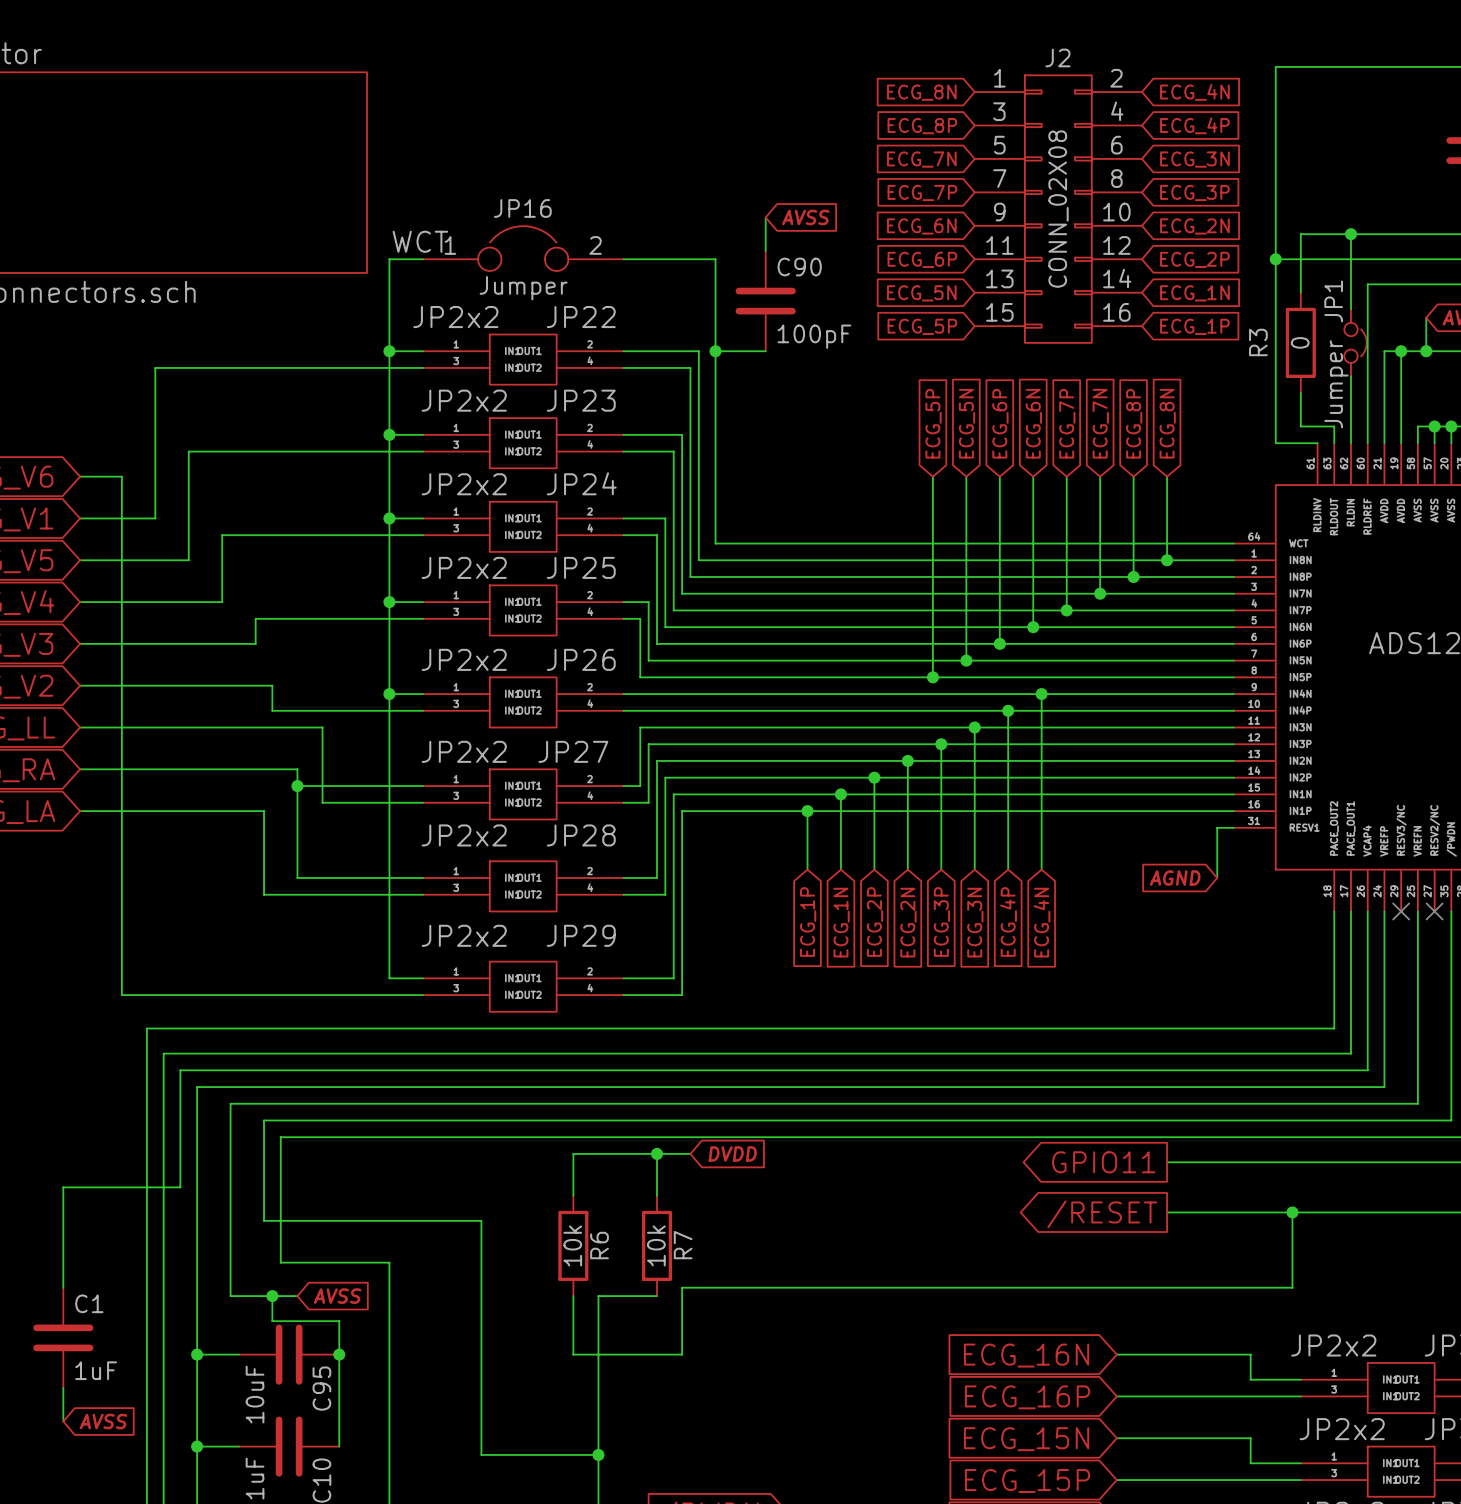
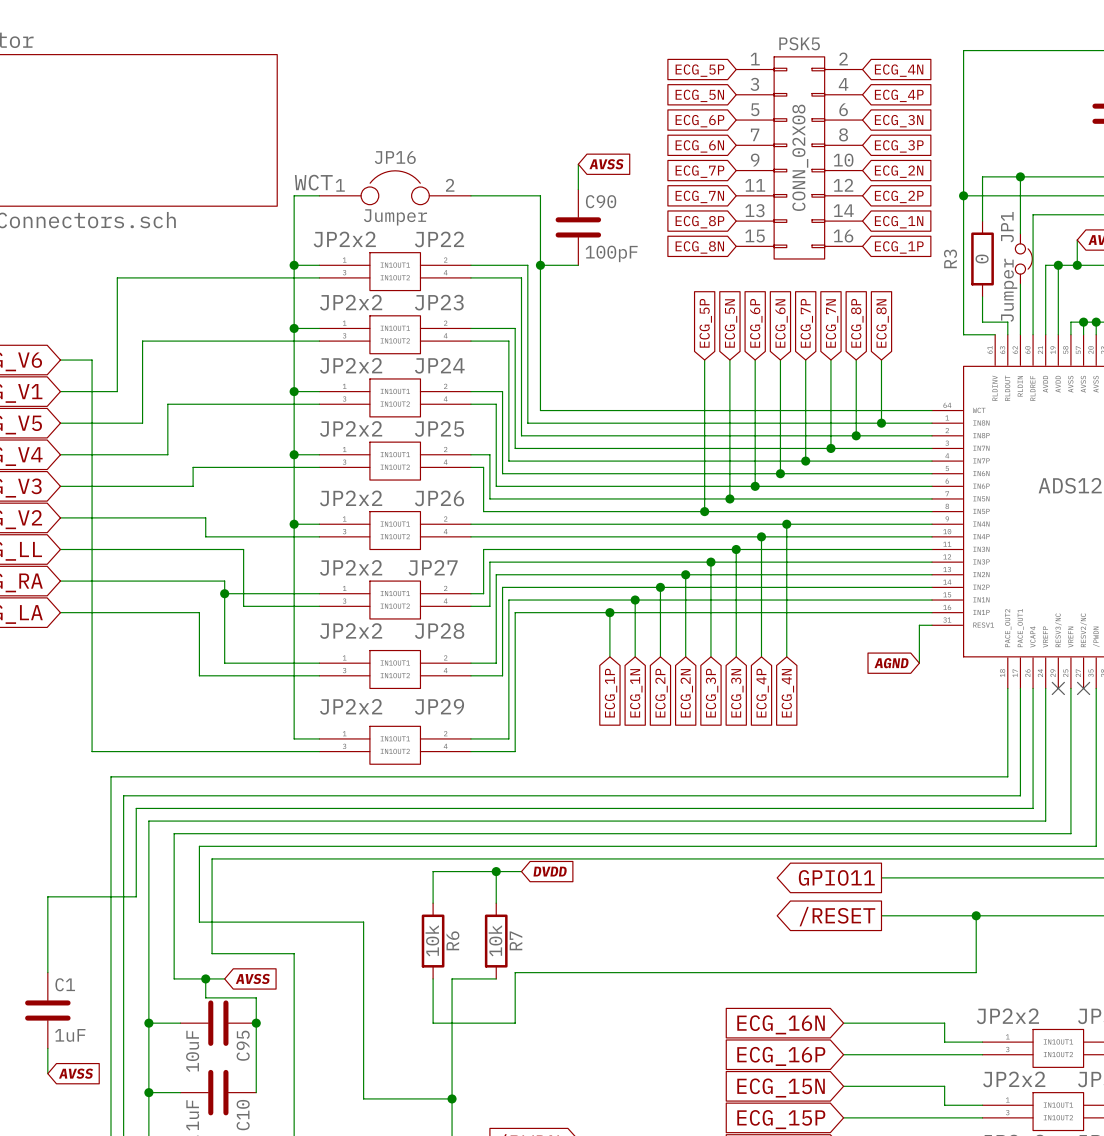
J2 name: J2 (1057, 57) -> PSK5 (799, 43)
global label: ECG_8N (921, 92) -> ECG_5P (699, 70)
global label: ECG_8P (922, 126) -> ECG_5N (699, 95)
global label: ECG_7N (921, 159) -> ECG_6P (699, 121)
global label: ECG_7P (922, 193) -> ECG_6N (699, 146)
global label: ECG_6N (921, 226) -> ECG_7P (699, 171)
global label: ECG_6P (922, 259) -> ECG_7N (699, 196)
global label: ECG_5N (921, 293) -> ECG_8P (699, 222)
global label: ECG_5P (922, 326) -> ECG_8N (699, 247)

